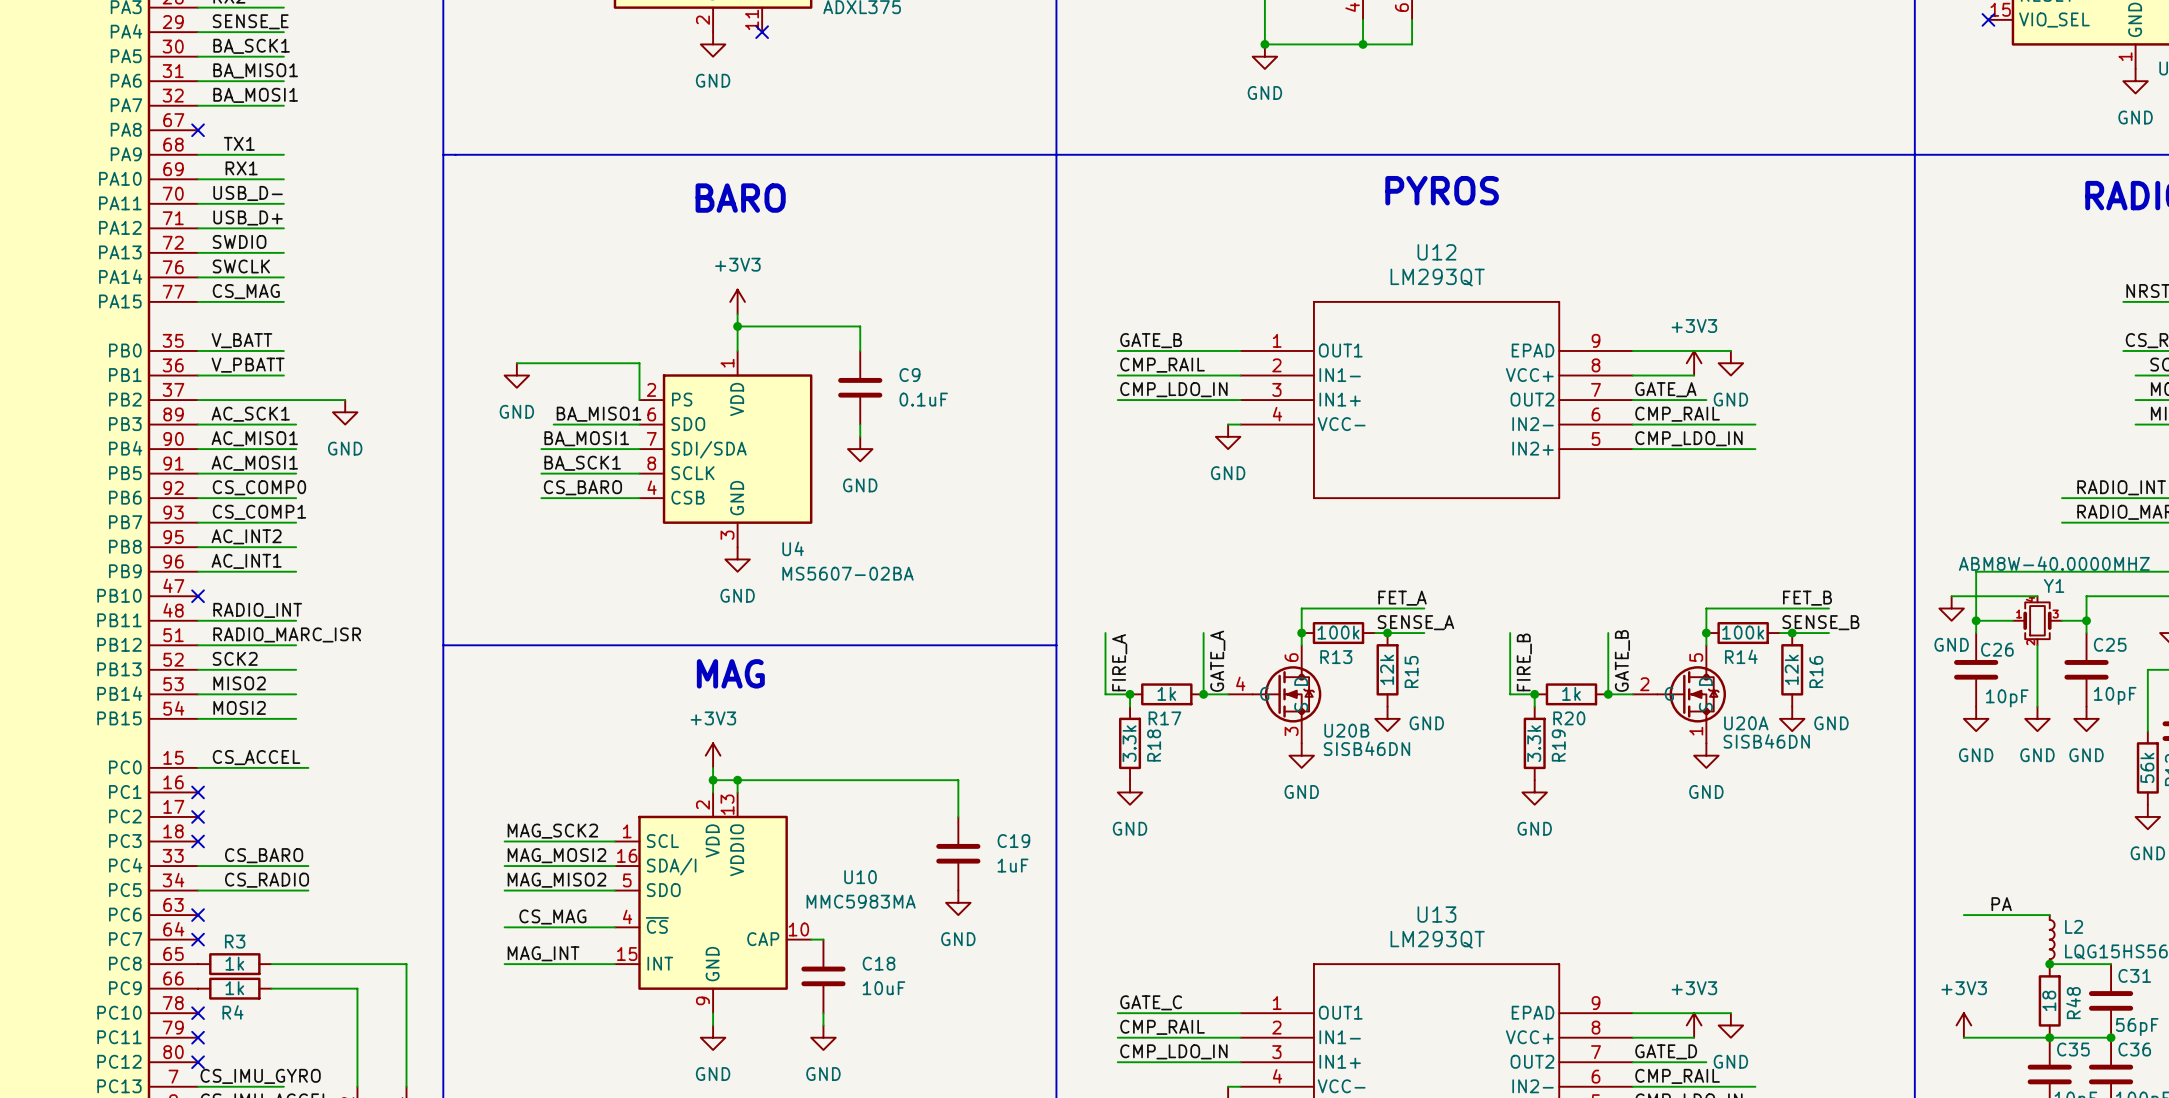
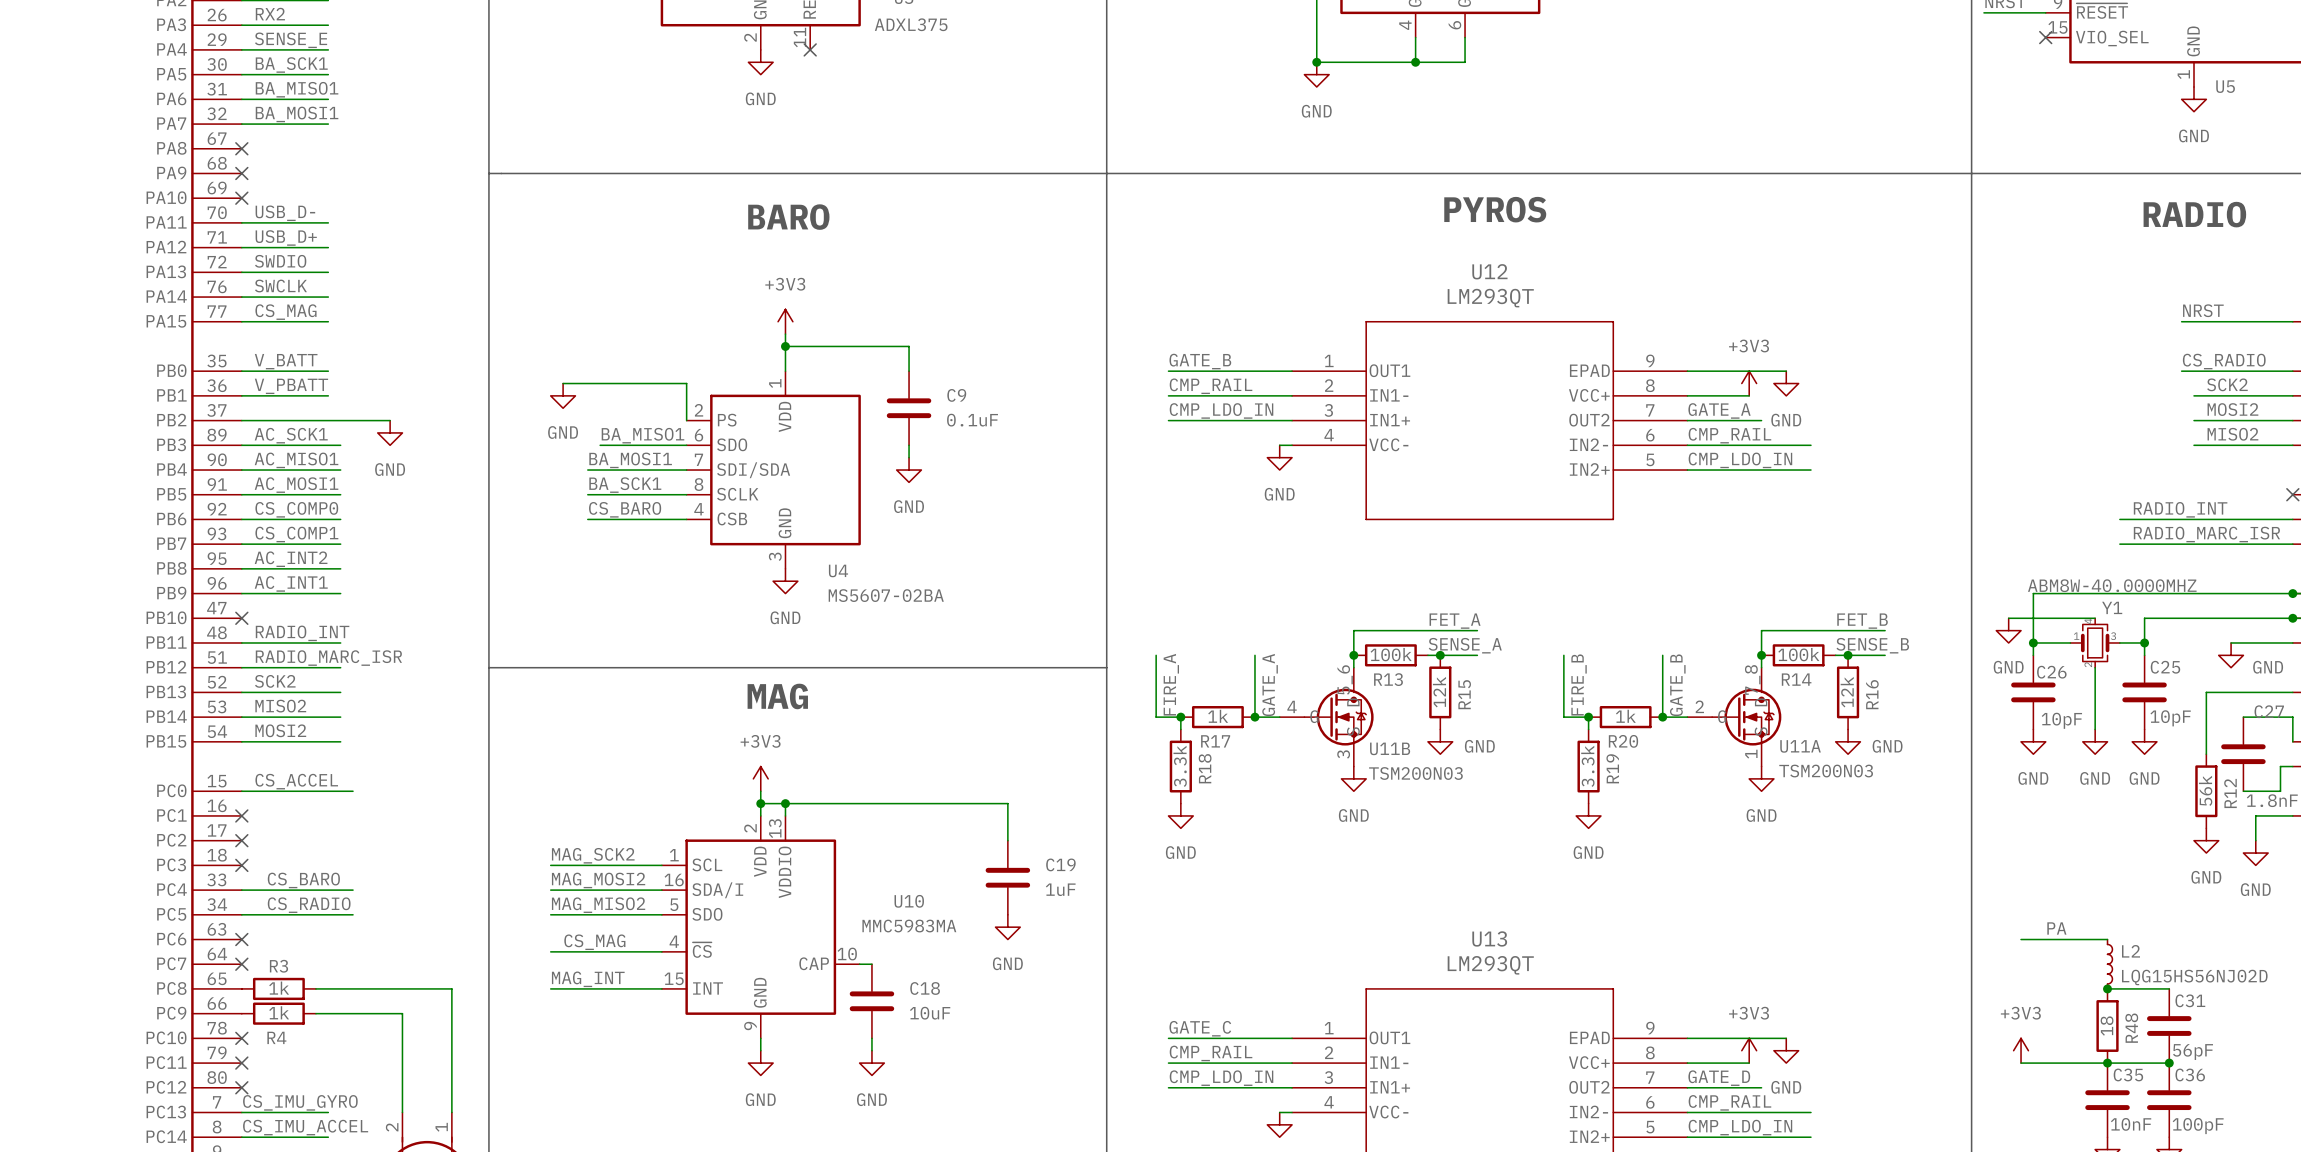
label: TX1 (239, 143) -> none
wire: (198, 154) (283, 154) -> none
no-connect mark: none -> (241, 173)
label: RX1 (241, 168) -> none
wire: (198, 179) (283, 179) -> none
no-connect mark: none -> (241, 198)
U20B: SISB46DN (1274, 694) -> none
U11B: none -> TSM200N03 (1326, 717)
U20A: SISB46DN (1679, 694) -> none
U11A: none -> TSM200N03 (1734, 717)

